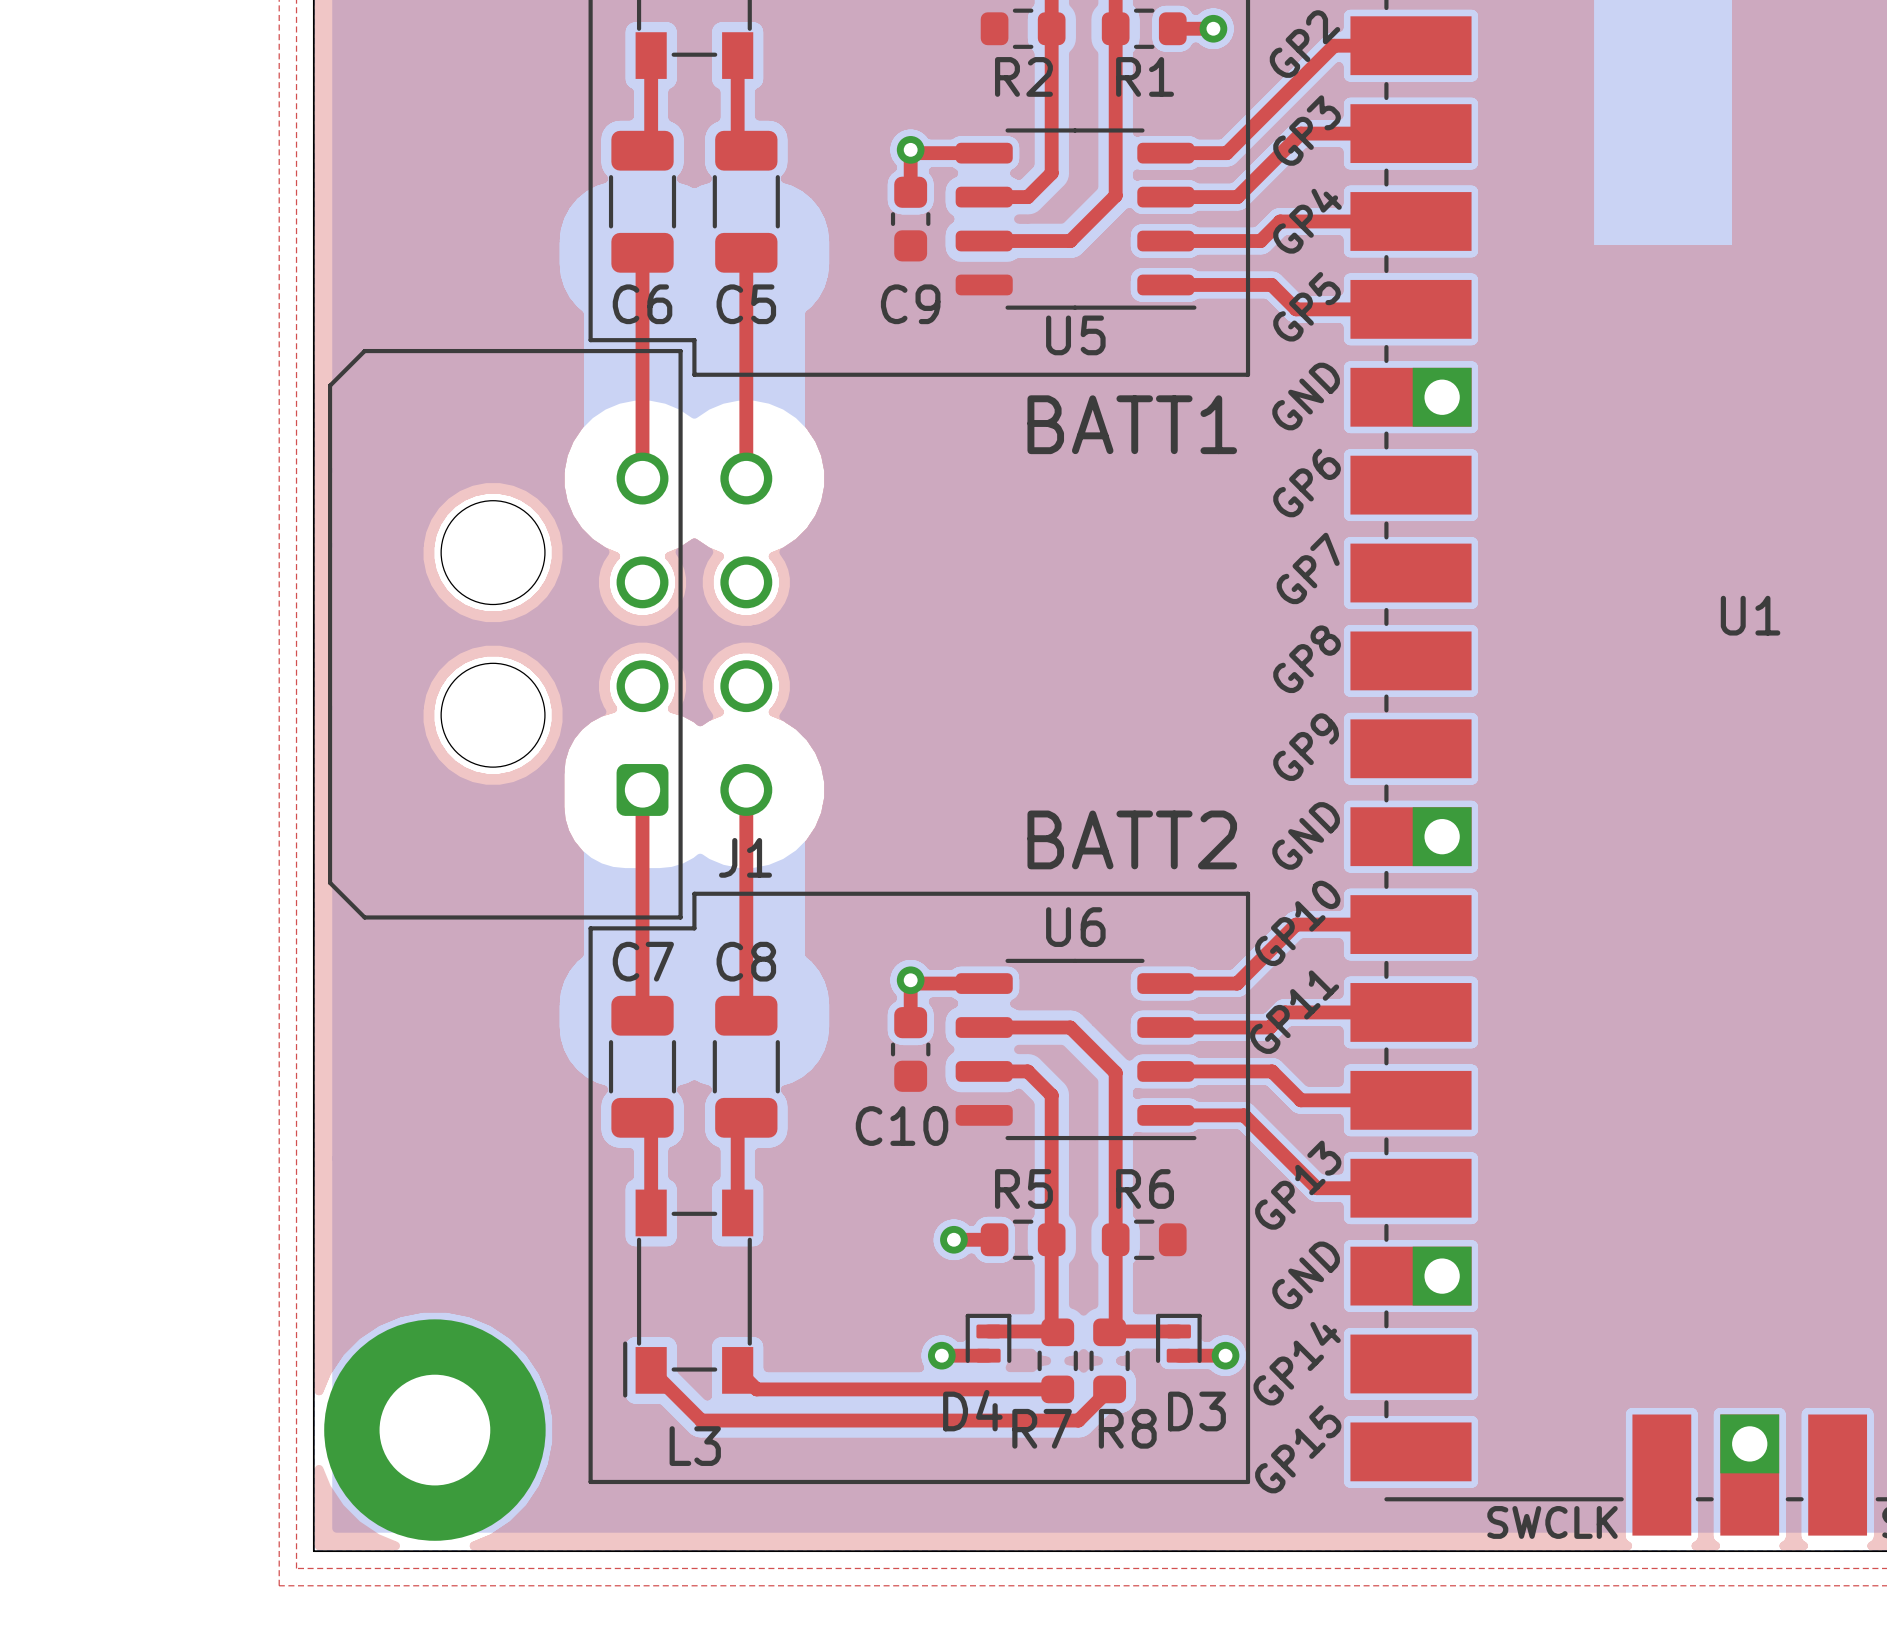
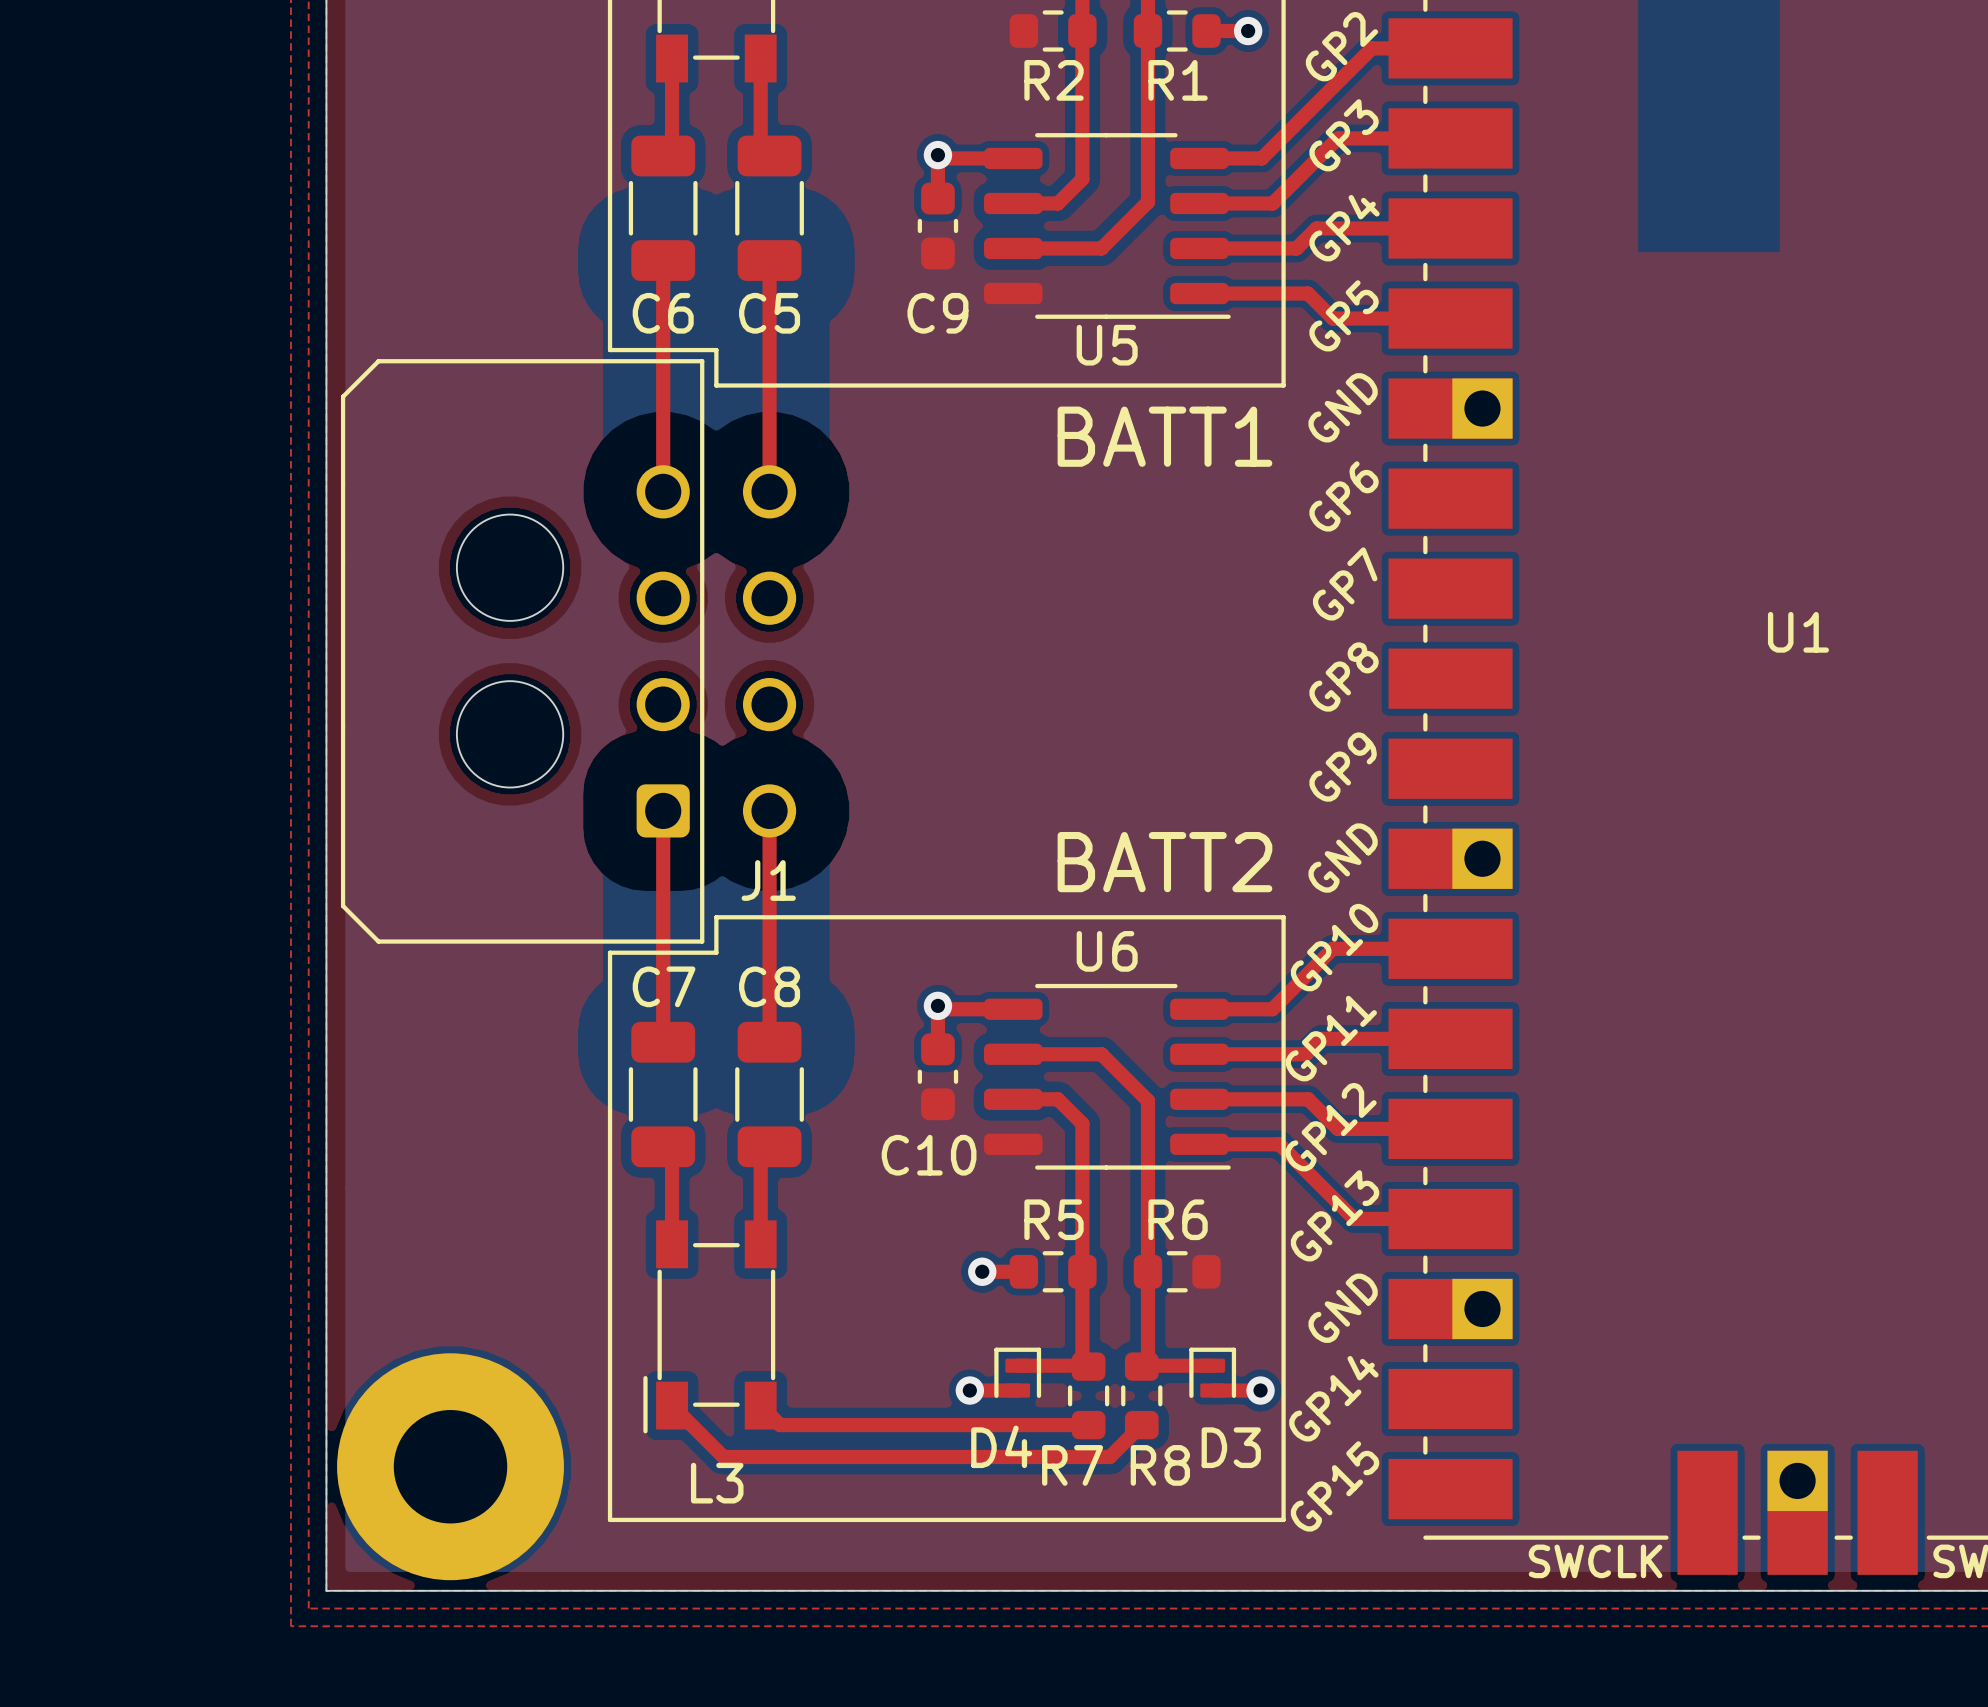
U1 text: none -> GP12 (1331, 1127)

